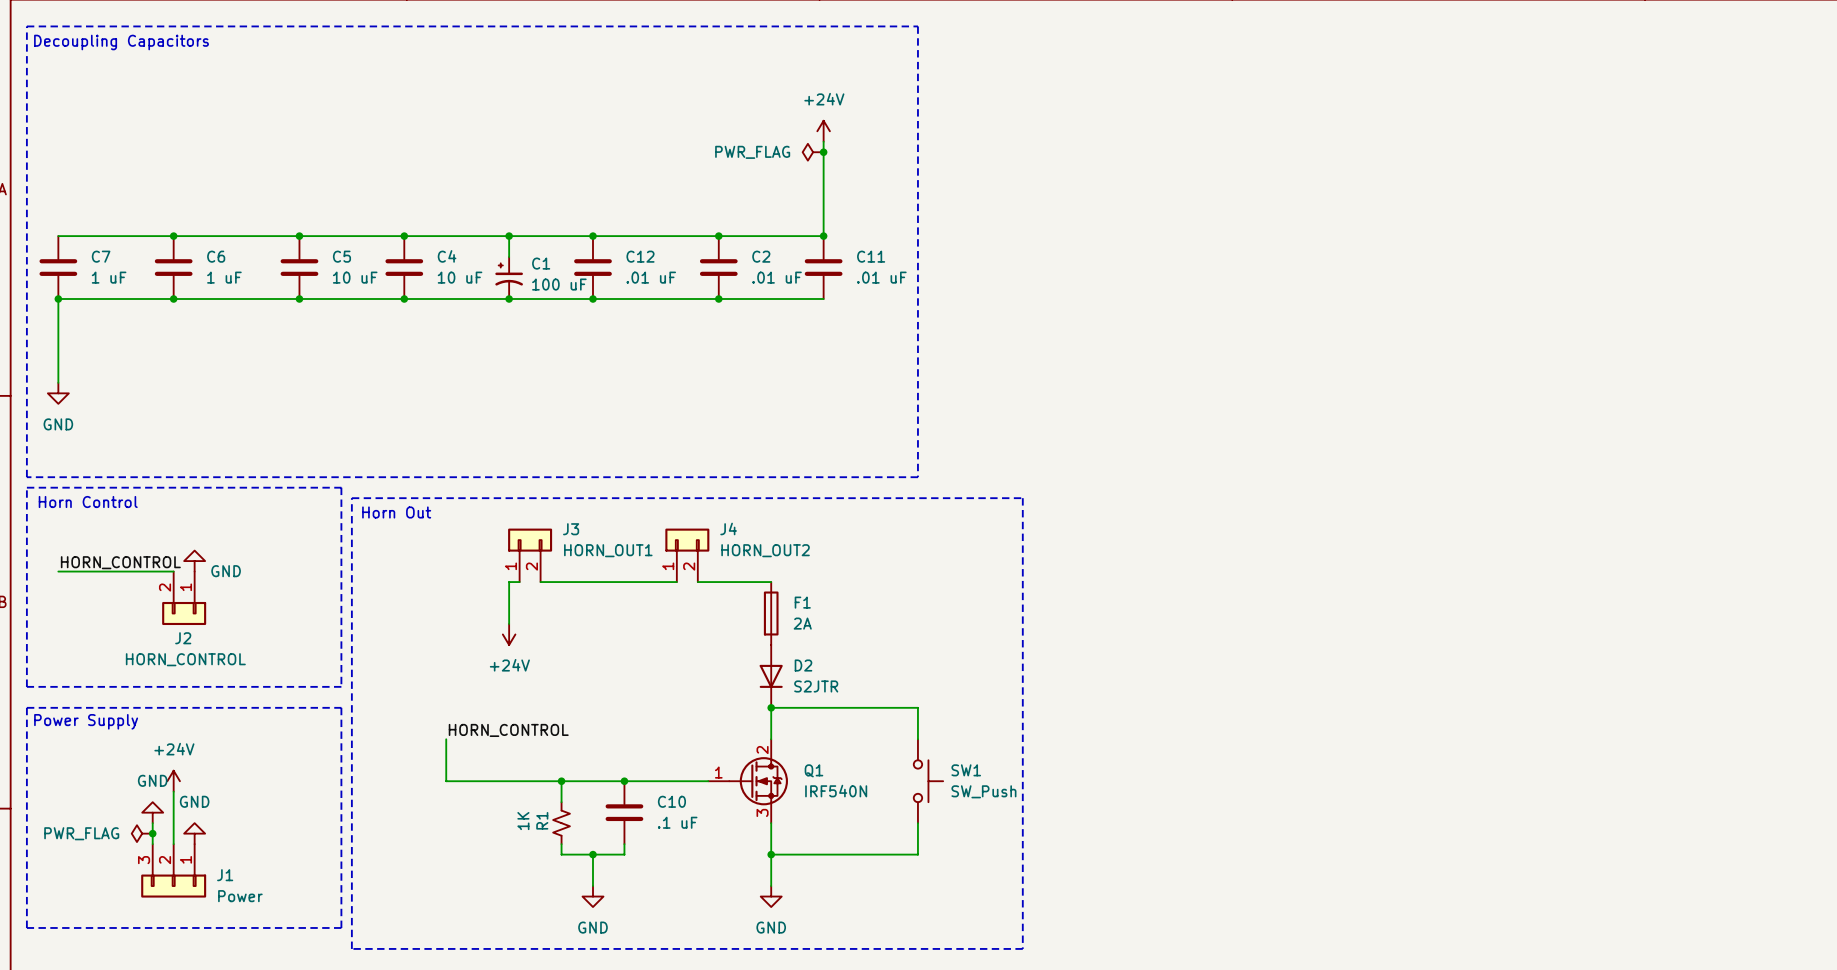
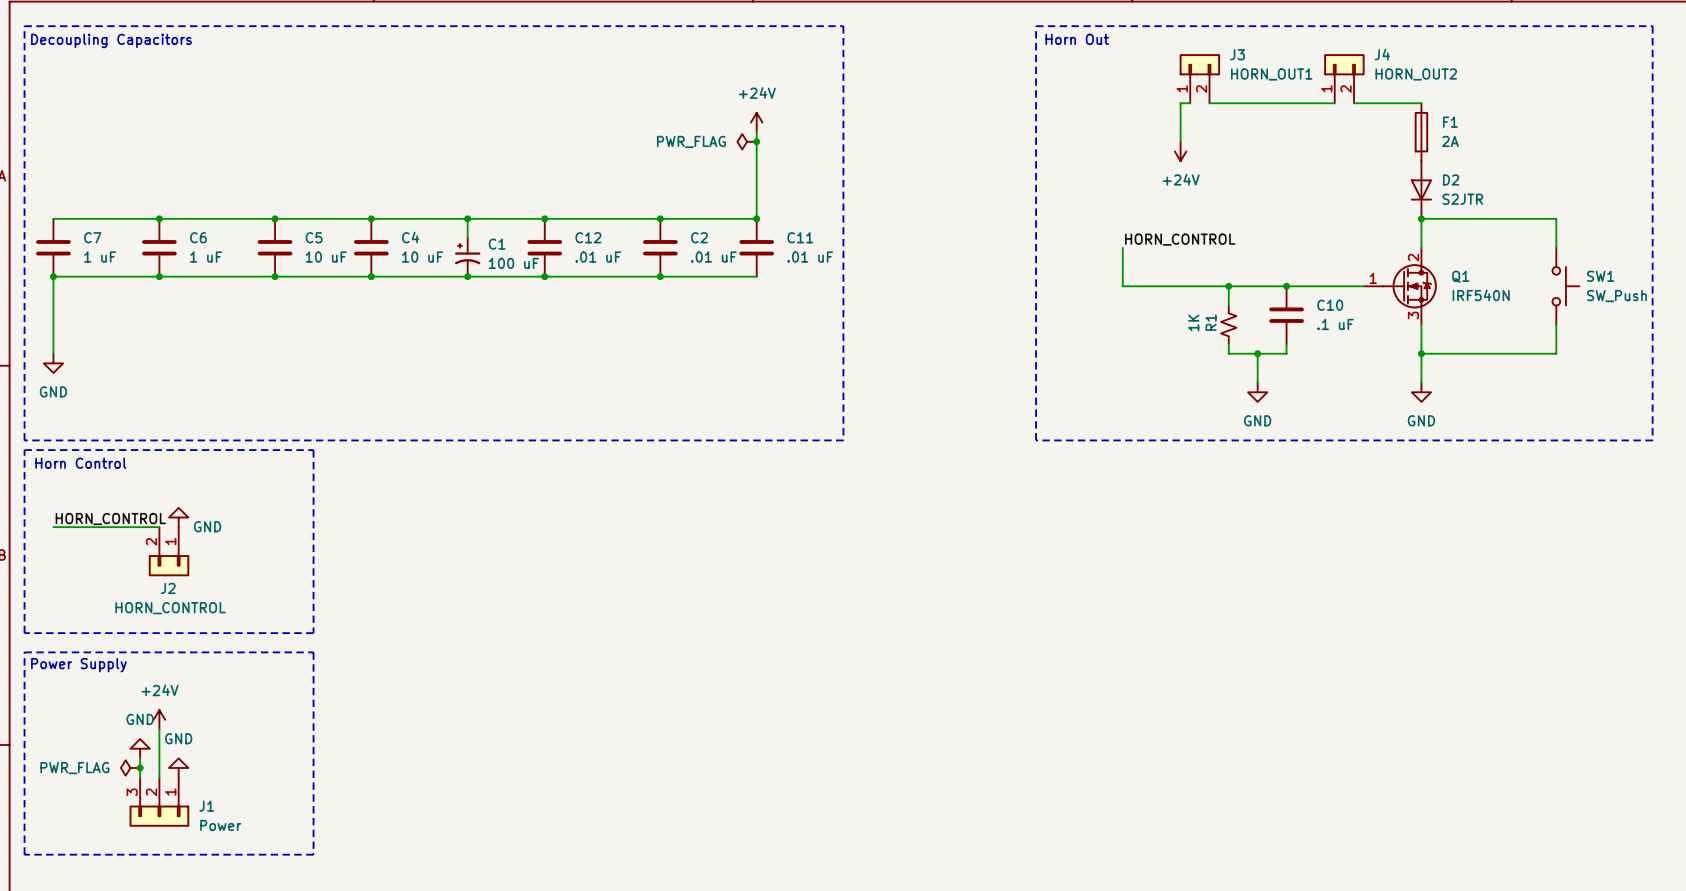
line: none -> (1036, 26) (1652, 26) (1652, 440) (1036, 440) (1036, 26)
text: none -> Horn Out (1077, 39)
wire: none -> (1190, 103) (1180, 103) (1180, 141)
wire: none -> (1209, 103) (1334, 103)
wire: none -> (1354, 103) (1421, 103)
power symbol: none -> +24V (1180, 151)
junction: none -> (1421, 218)
label: none -> HORN_CONTROL (1180, 239)
wire: none -> (1122, 247) (1122, 286) (1363, 286)
wire: none -> (1421, 247) (1421, 218) (1556, 218) (1556, 247)
wire: none -> (1228, 286) (1228, 305)
junction: none -> (1228, 286)
junction: none -> (1286, 286)
wire: none -> (1421, 324) (1421, 382)
wire: none -> (1556, 324) (1556, 353) (1421, 353)
wire: none -> (1228, 344) (1228, 353) (1286, 353) (1286, 344)
wire: none -> (1257, 353) (1257, 382)
junction: none -> (1257, 353)
junction: none -> (1421, 353)
power symbol: none -> GND (1257, 392)
power symbol: none -> GND (1421, 392)
line: (351, 498) (1022, 498) (1022, 948) (351, 948) (351, 498) -> none
text: Horn Out (396, 512) -> none
J3 position: (530, 555) -> (1199, 78)
J4 position: (687, 555) -> (1344, 78)
wire: (519, 582) (509, 582) (509, 623) -> none
wire: (540, 582) (676, 582) -> none
wire: (697, 582) (771, 582) -> none
F1 position: (771, 613) -> (1421, 132)
power symbol: +24V (509, 634) -> none
D2 position: (771, 676) -> (1421, 189)
junction: (771, 707) -> none
label: HORN_CONTROL (508, 730) -> none
wire: (446, 739) (446, 781) (708, 781) -> none
wire: (771, 739) (771, 707) (917, 707) (917, 739) -> none
wire: (561, 781) (561, 802) -> none
junction: (561, 781) -> none
junction: (624, 781) -> none
Q1 position: (748, 781) -> (1400, 286)
SW1 position: (928, 781) -> (1565, 286)
C10 position: (624, 812) -> (1286, 315)
R1 position: (561, 823) -> (1228, 324)
wire: (771, 823) (771, 886) -> none
wire: (917, 823) (917, 854) (771, 854) -> none
wire: (561, 844) (561, 854) (624, 854) (624, 844) -> none
wire: (592, 854) (592, 886) -> none
junction: (592, 854) -> none
junction: (771, 854) -> none
power symbol: GND (592, 896) -> none
power symbol: GND (771, 896) -> none

